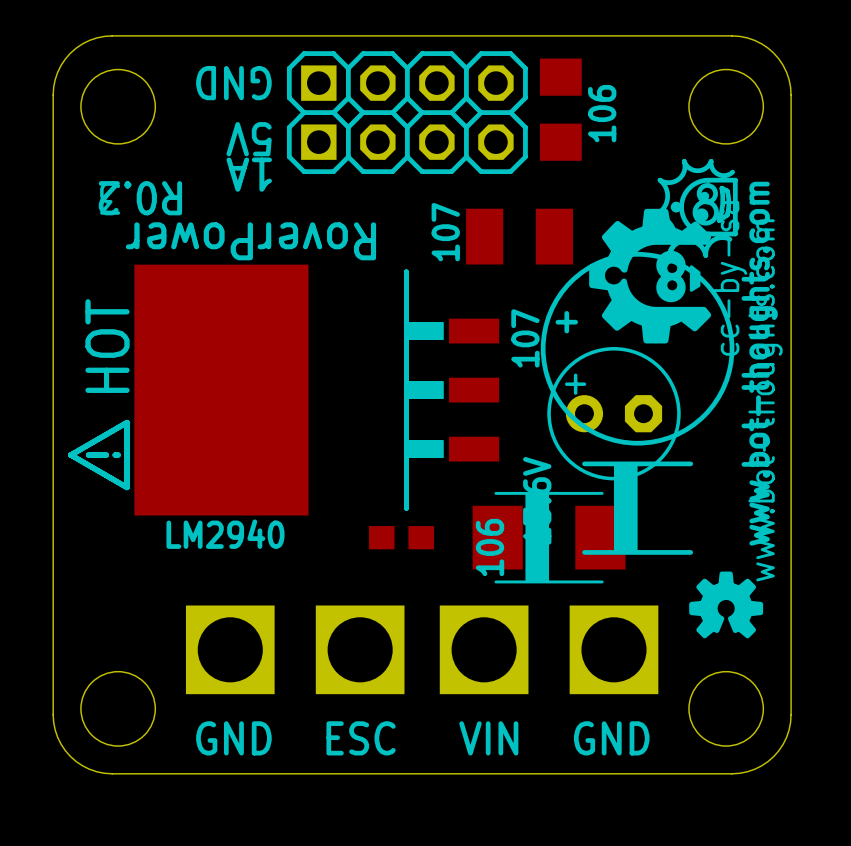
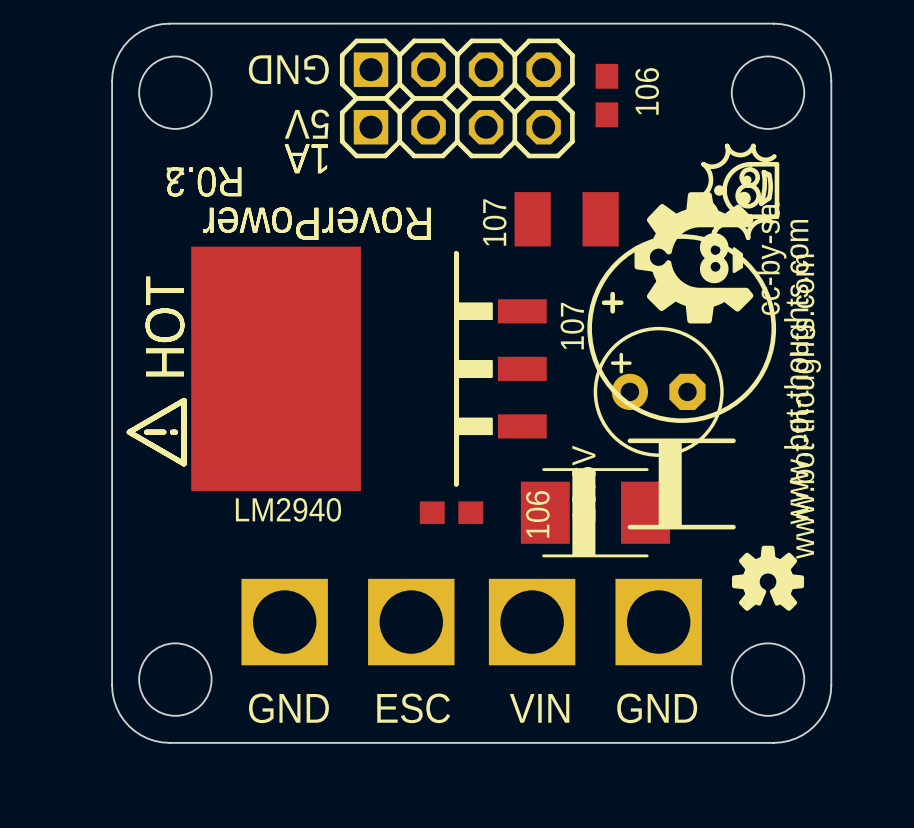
part footprint: [539, 58, 582, 161] -> [595, 63, 619, 128]

